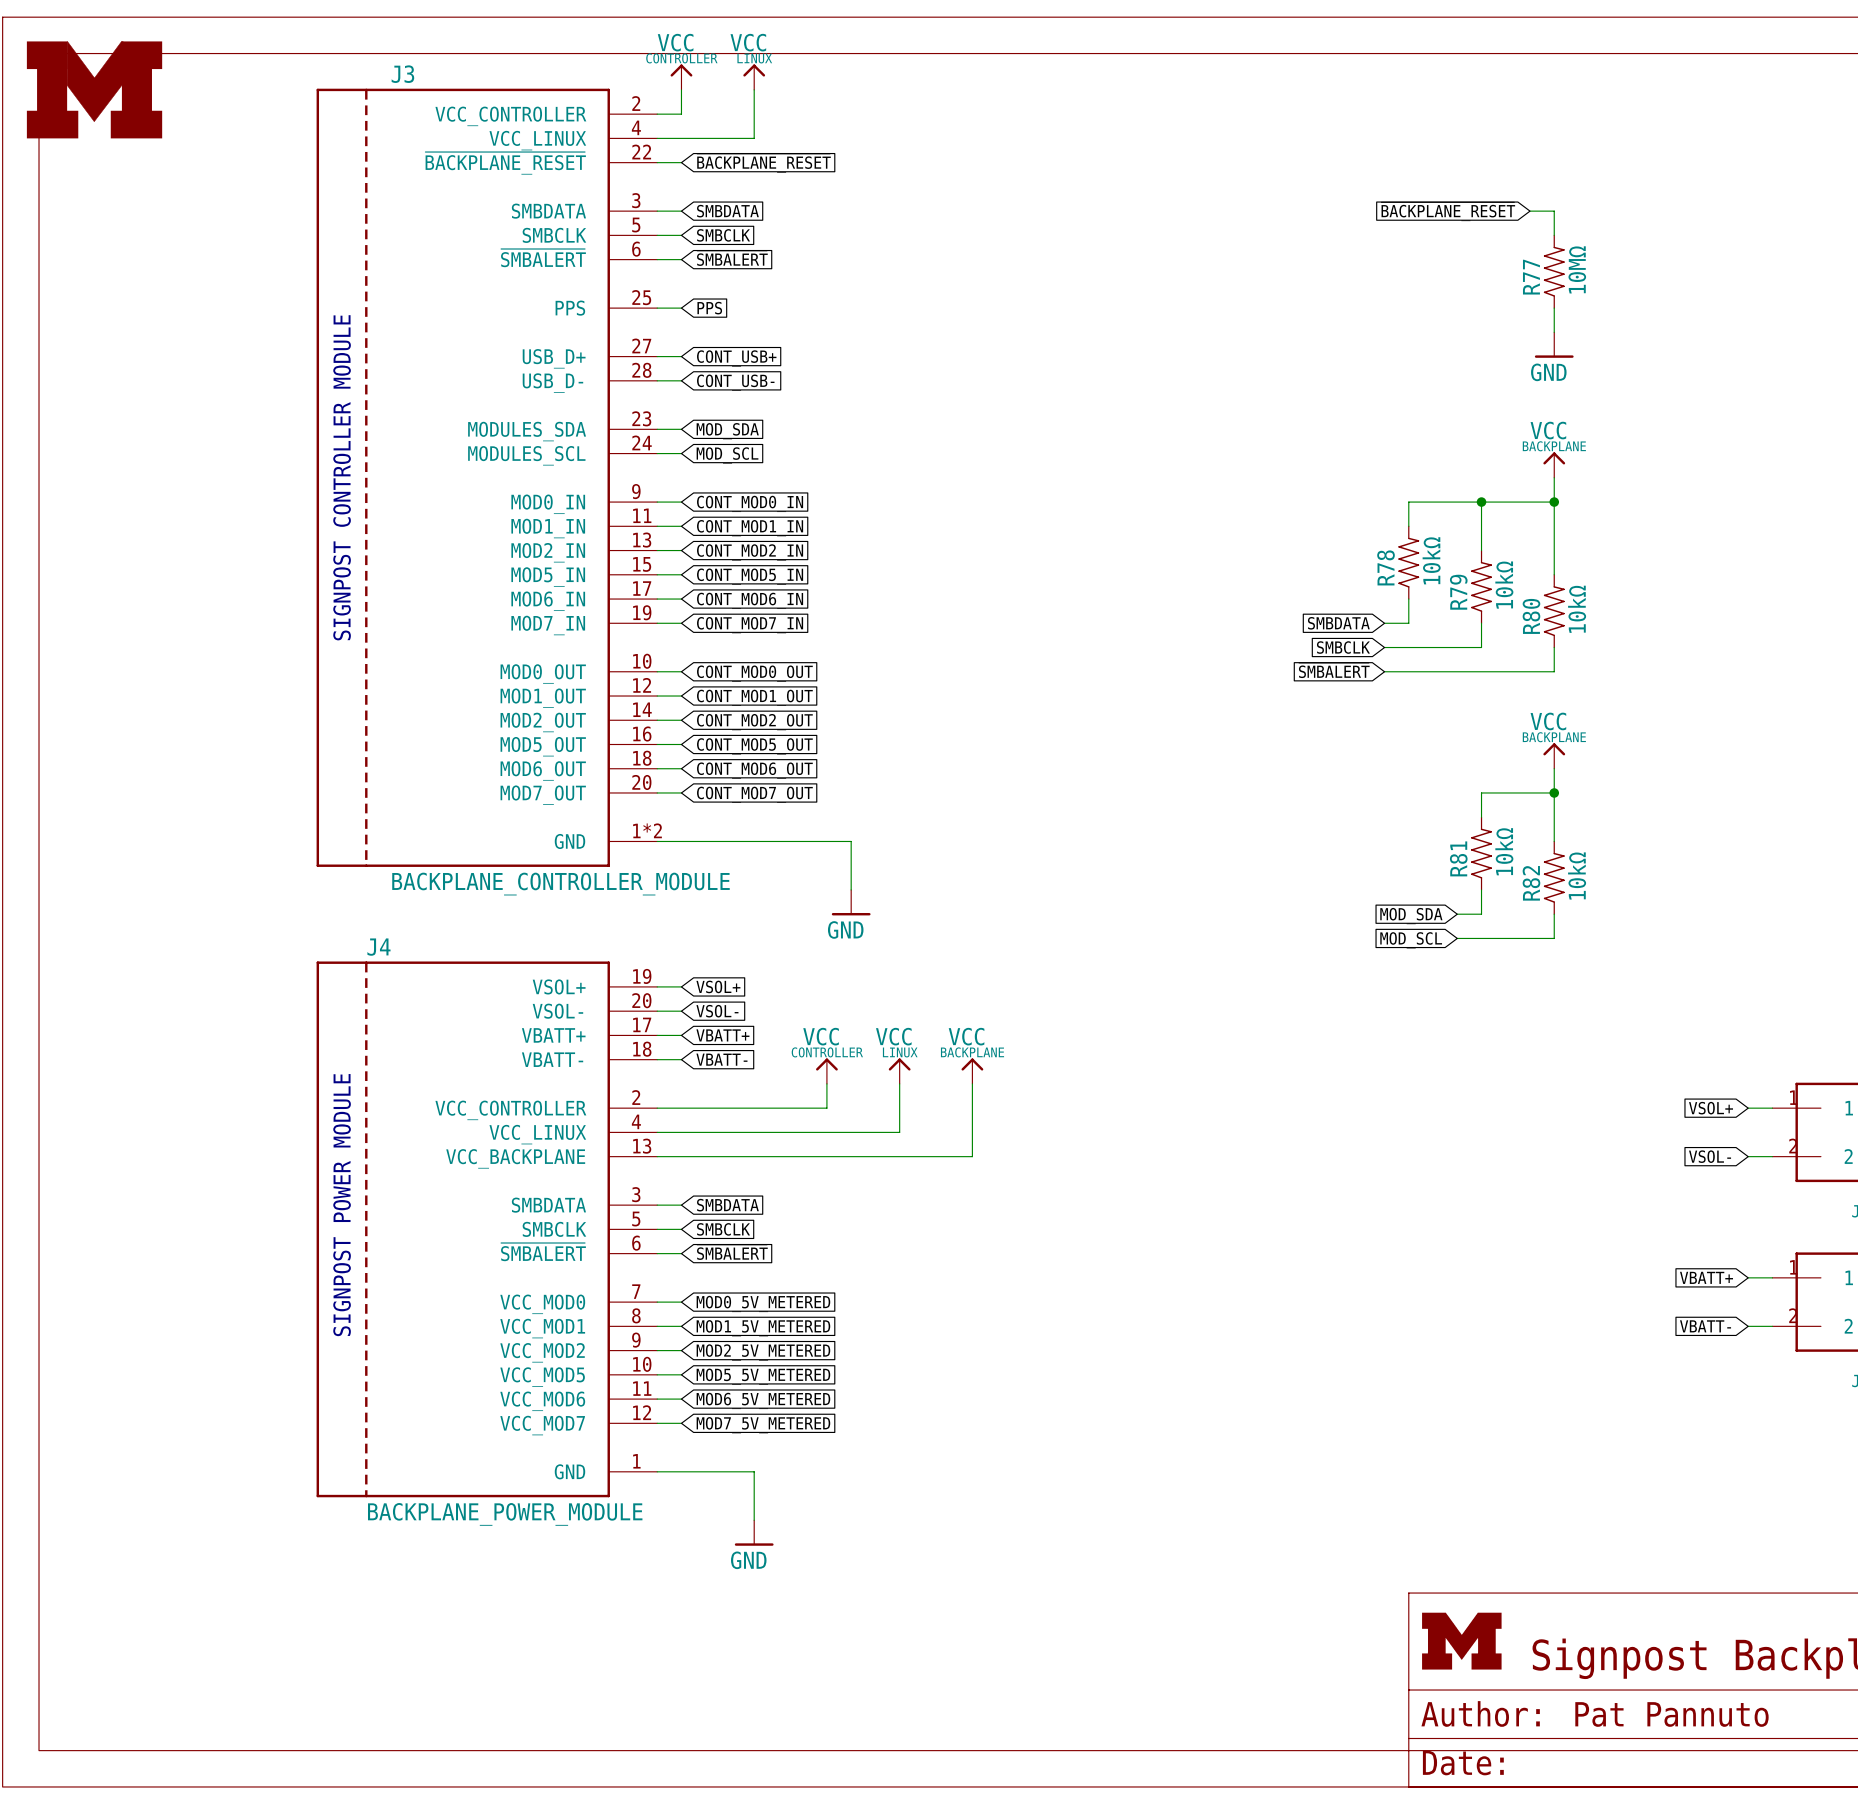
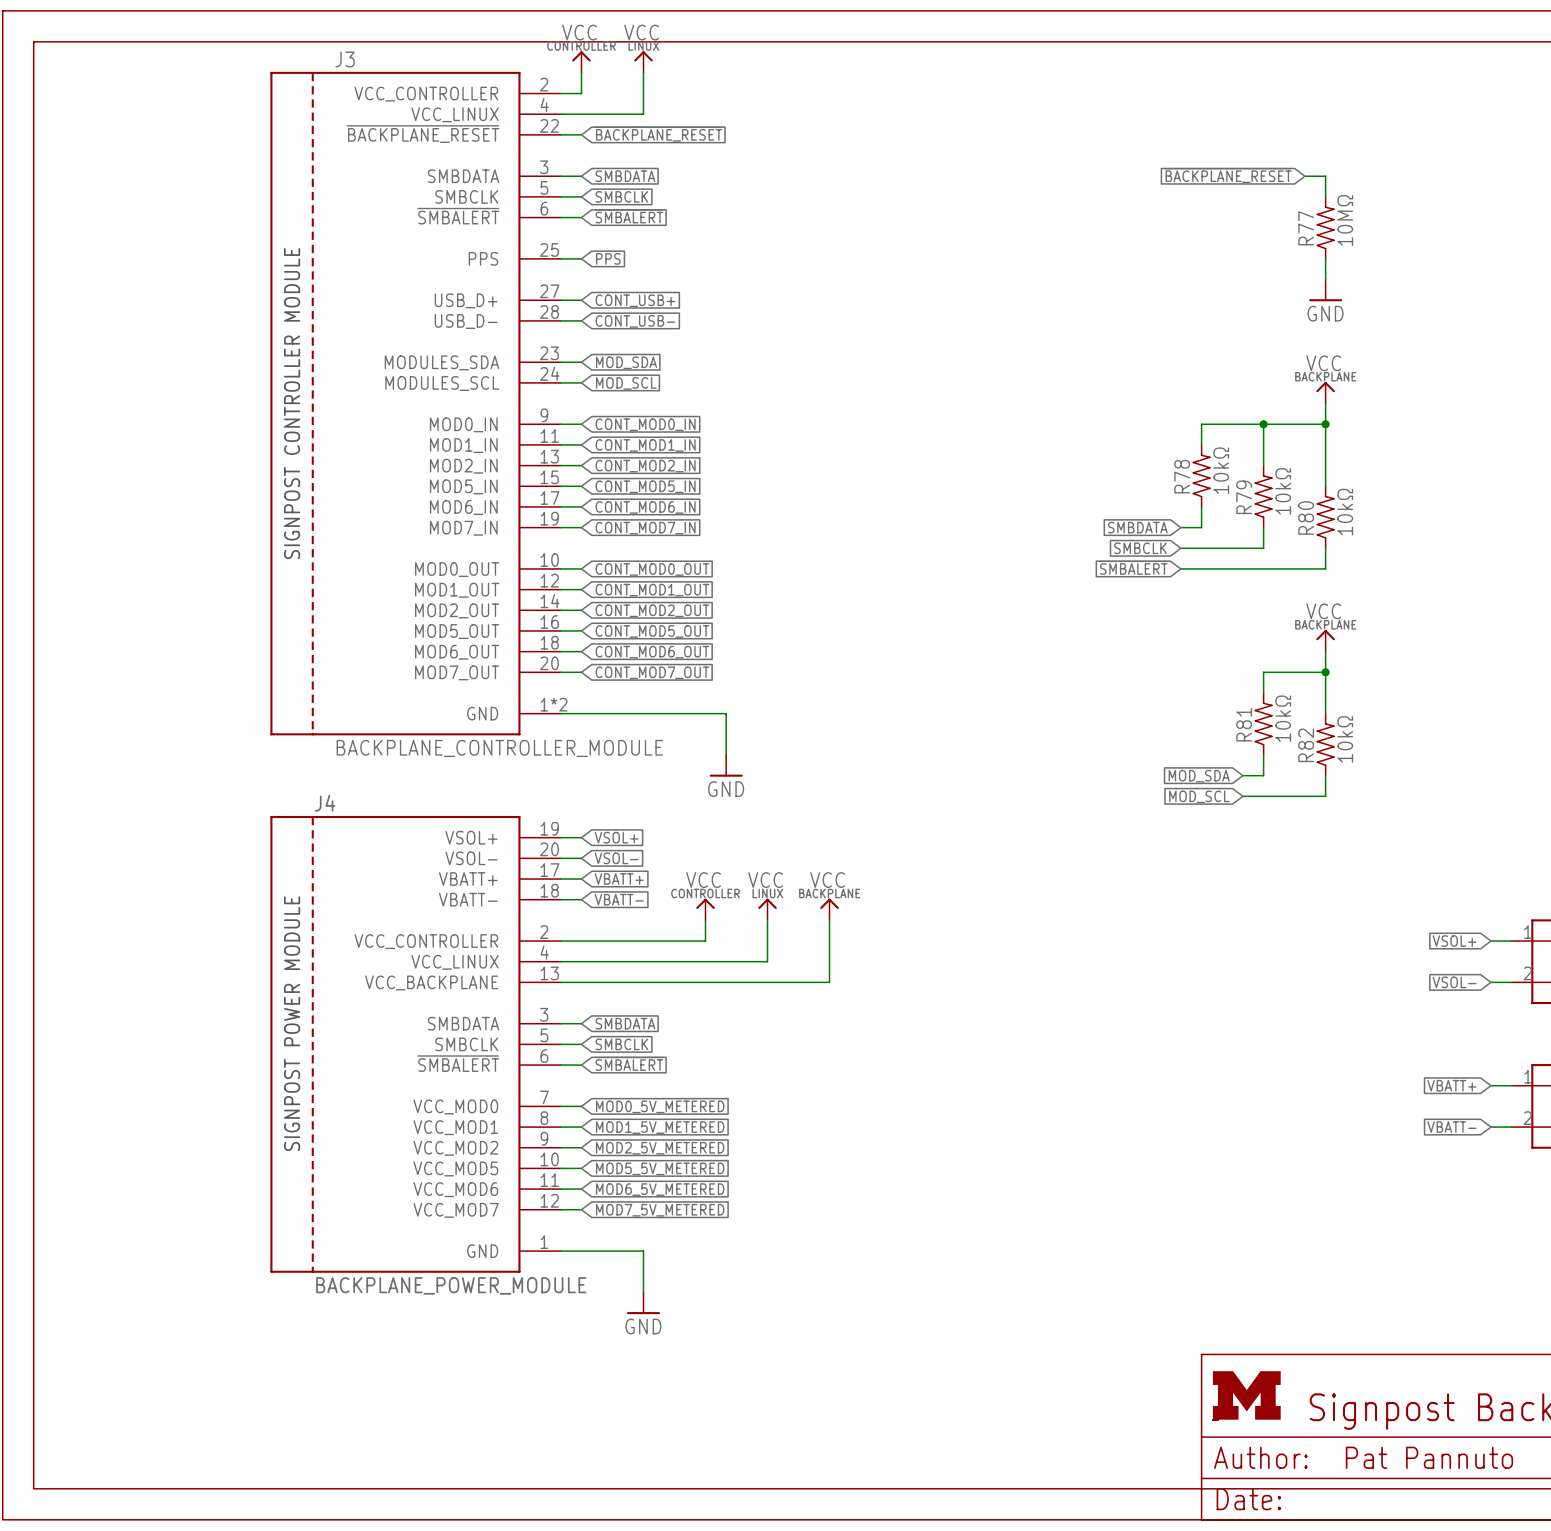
part: (94, 89) -> none

